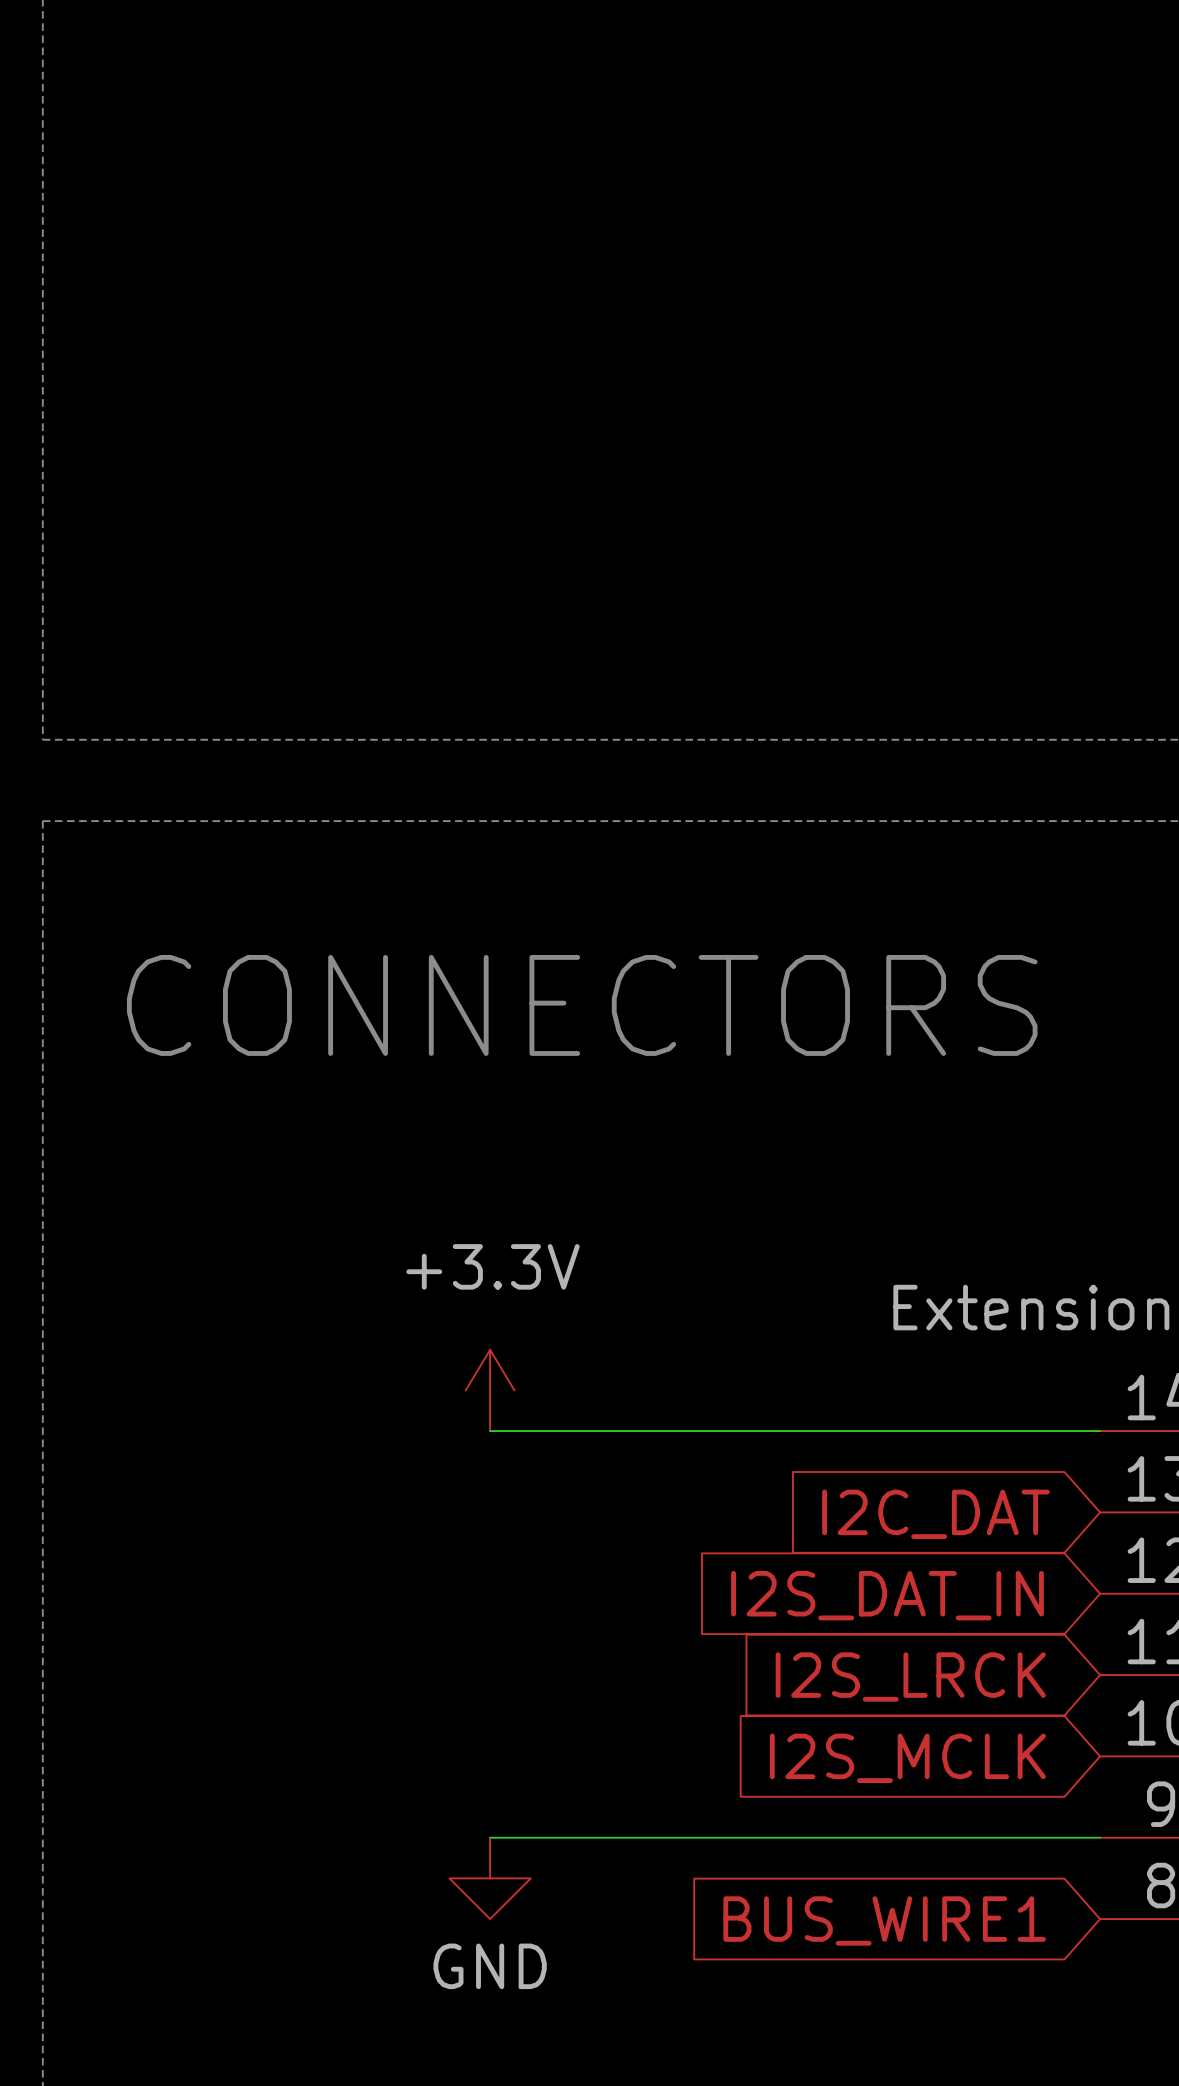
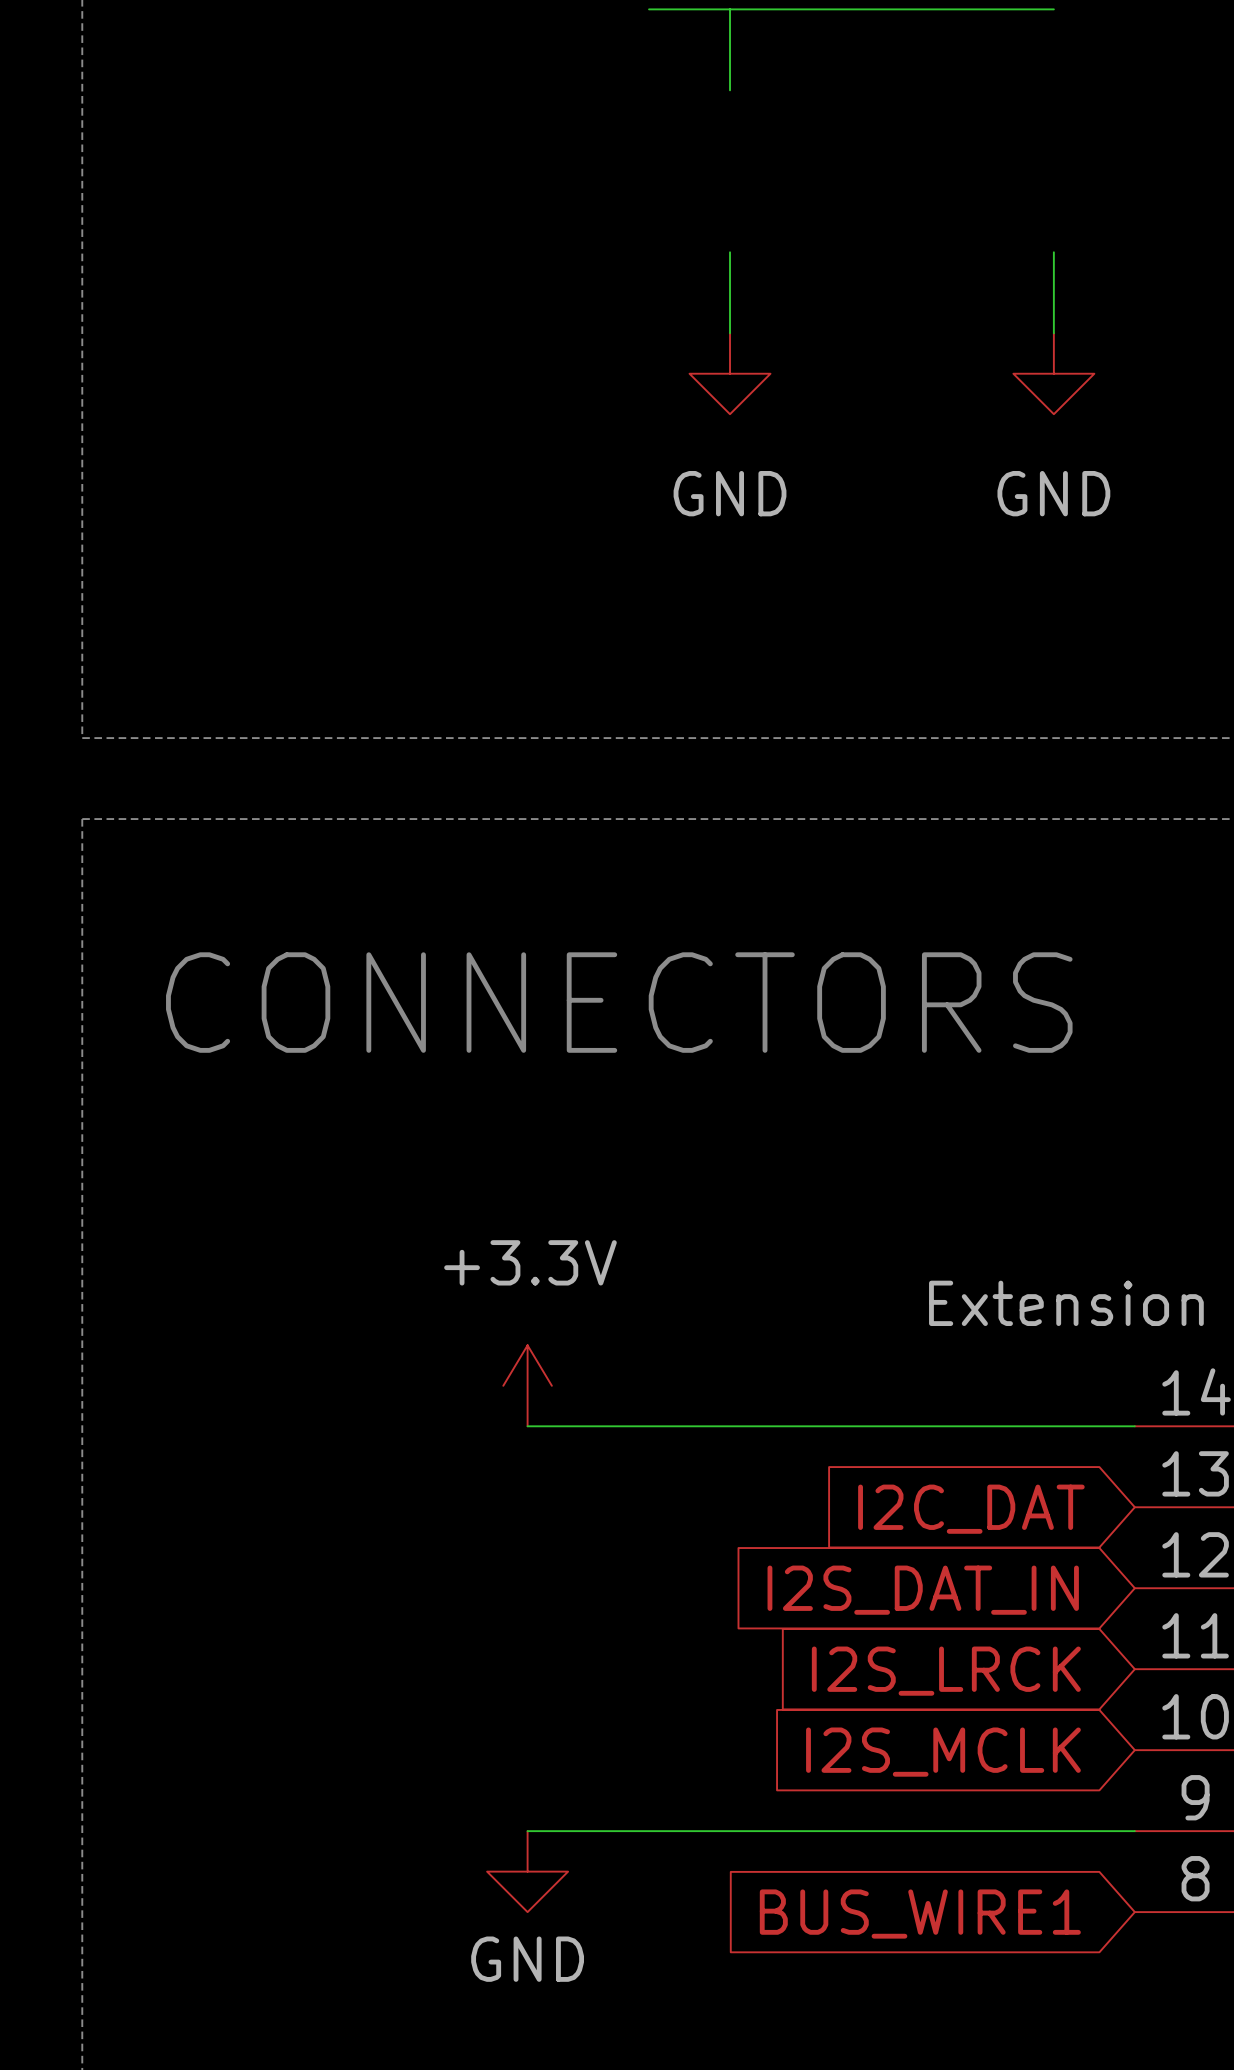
wire: none -> (649, 9) (1053, 9)
wire: none -> (730, 9) (730, 90)
wire: none -> (730, 252) (730, 333)
wire: none -> (1053, 252) (1053, 333)
power symbol: none -> GND (730, 373)
power symbol: none -> GND (1053, 373)

